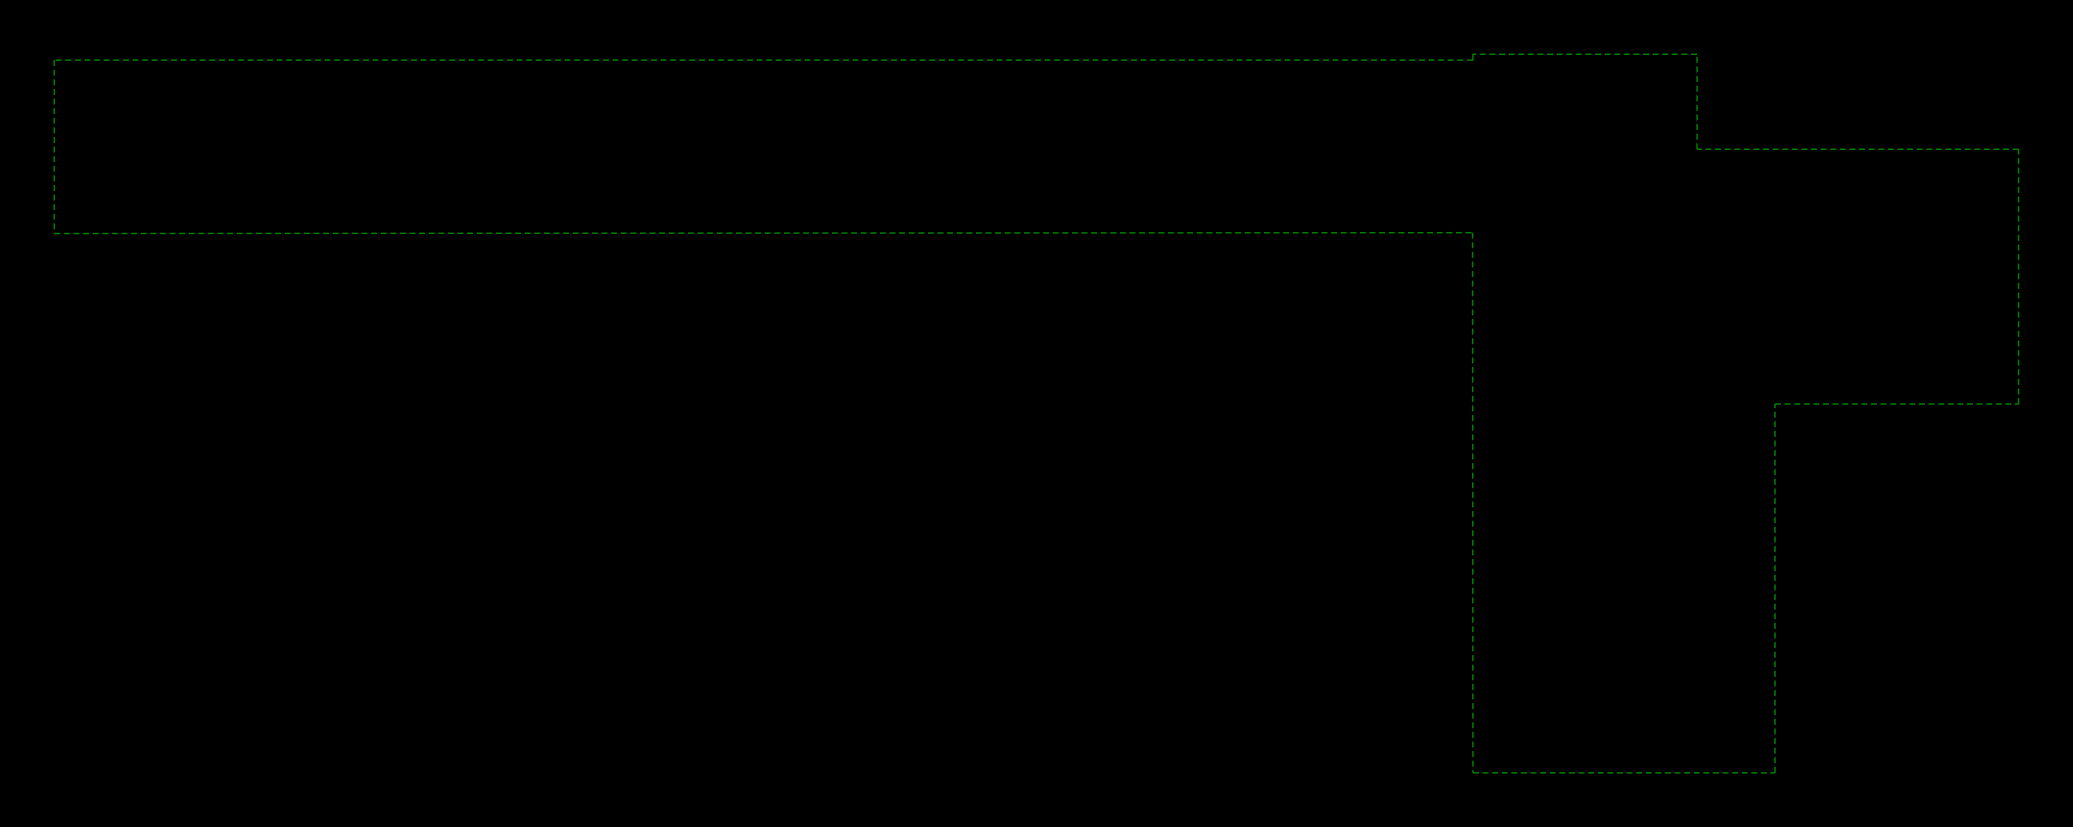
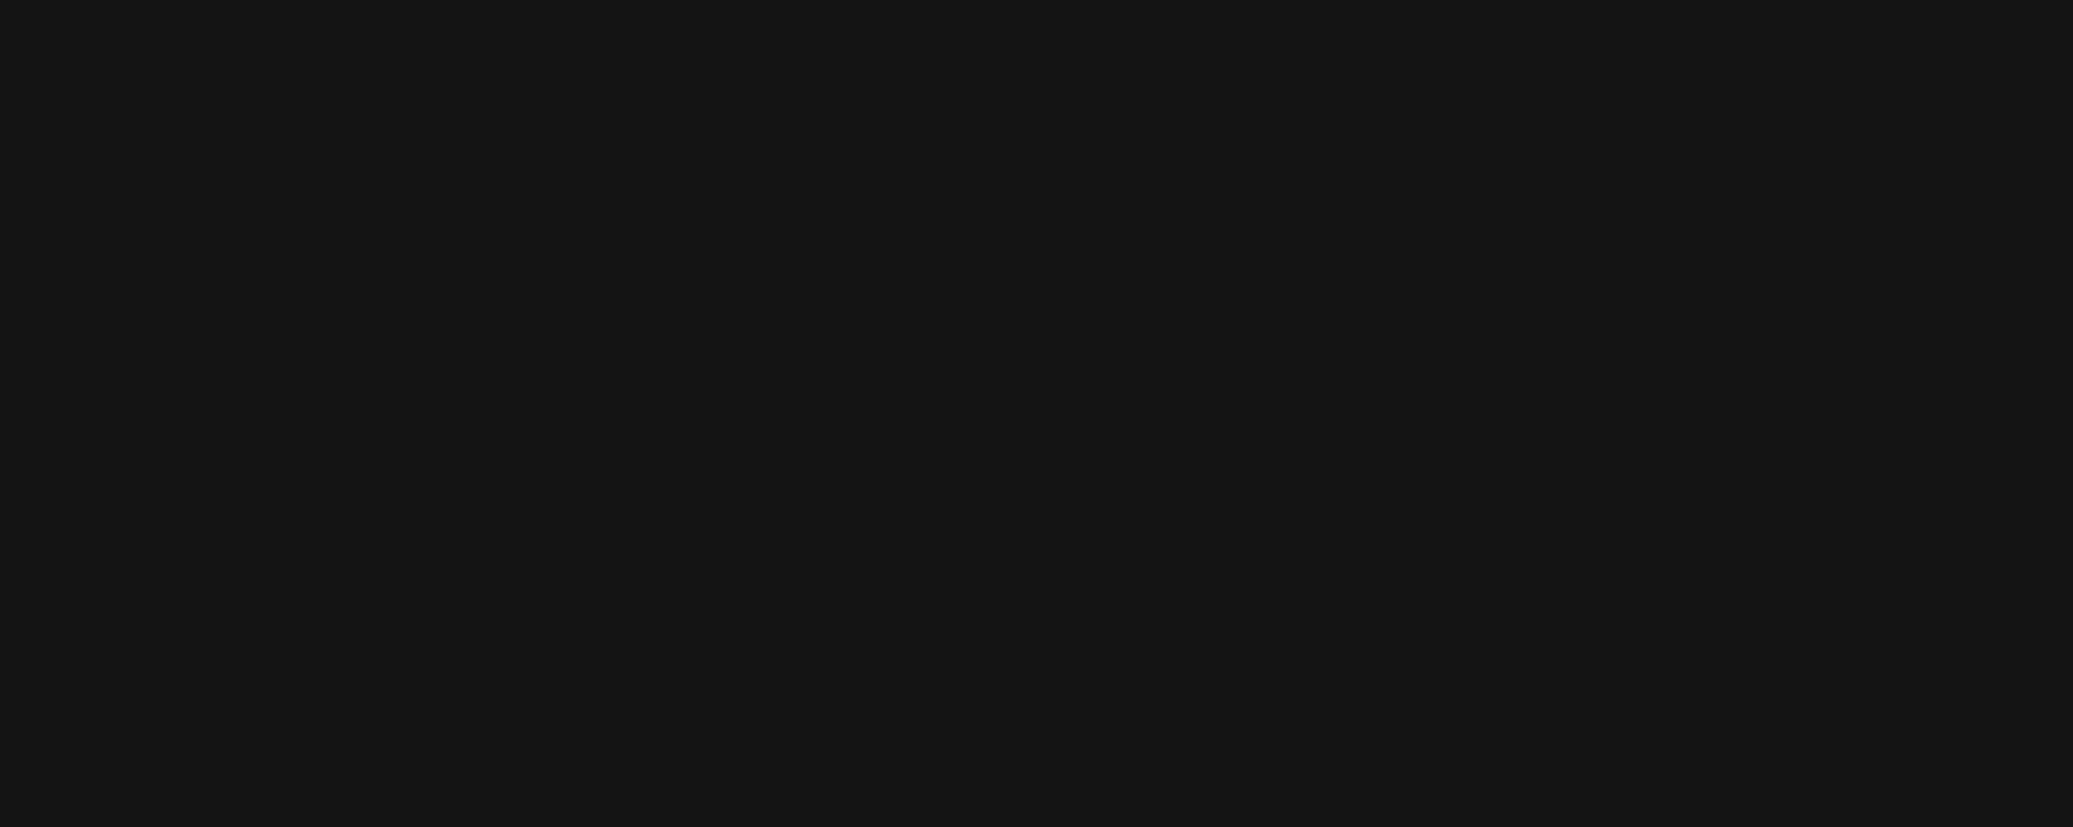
zone outline: (1697, 54) (1472, 54) (1472, 60) (54, 60) (54, 233) (1472, 232) (1472, 772) (1774, 772) (1774, 404) (2018, 404) (2018, 149) (1697, 149) (1697, 54) -> none

